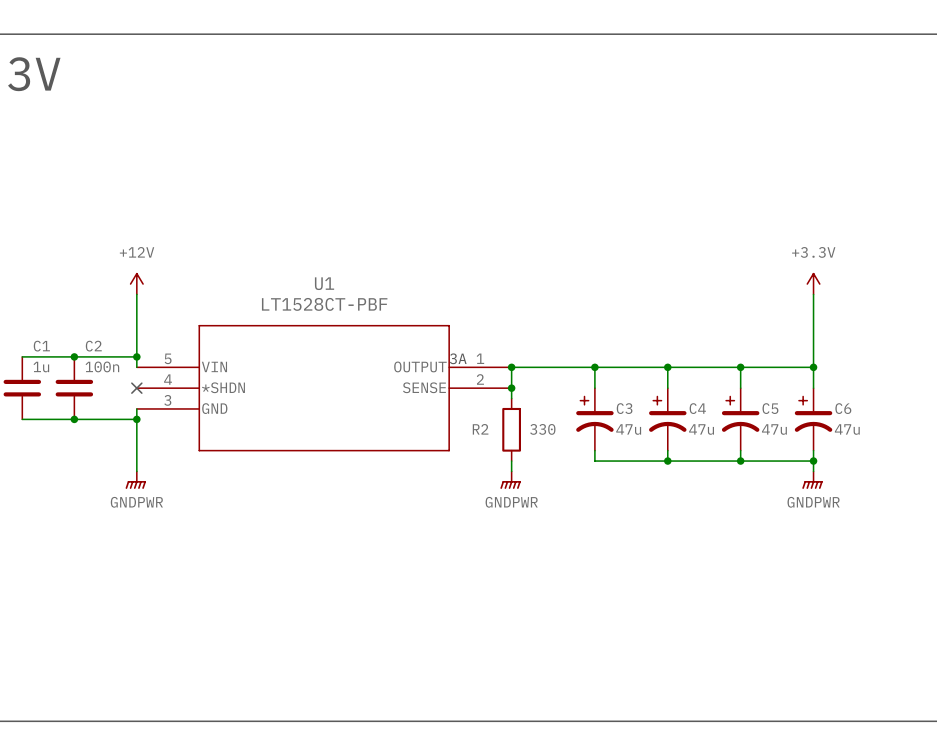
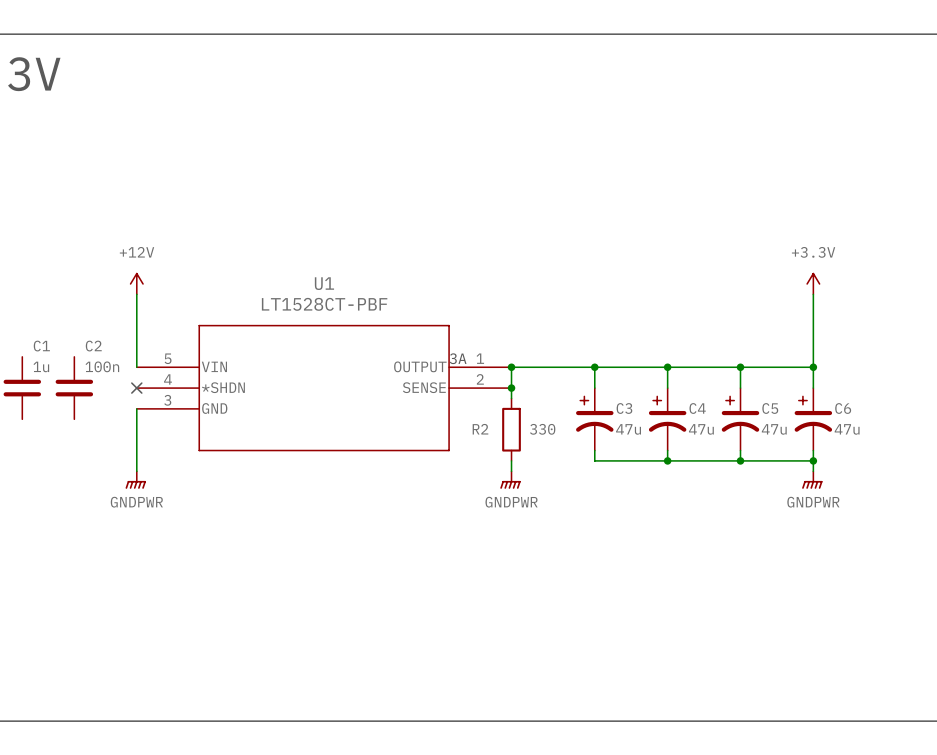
wire: (22, 356) (136, 356) -> none
junction: (74, 356) -> none
junction: (136, 356) -> none
wire: (22, 419) (136, 419) -> none
junction: (74, 419) -> none
junction: (136, 419) -> none

